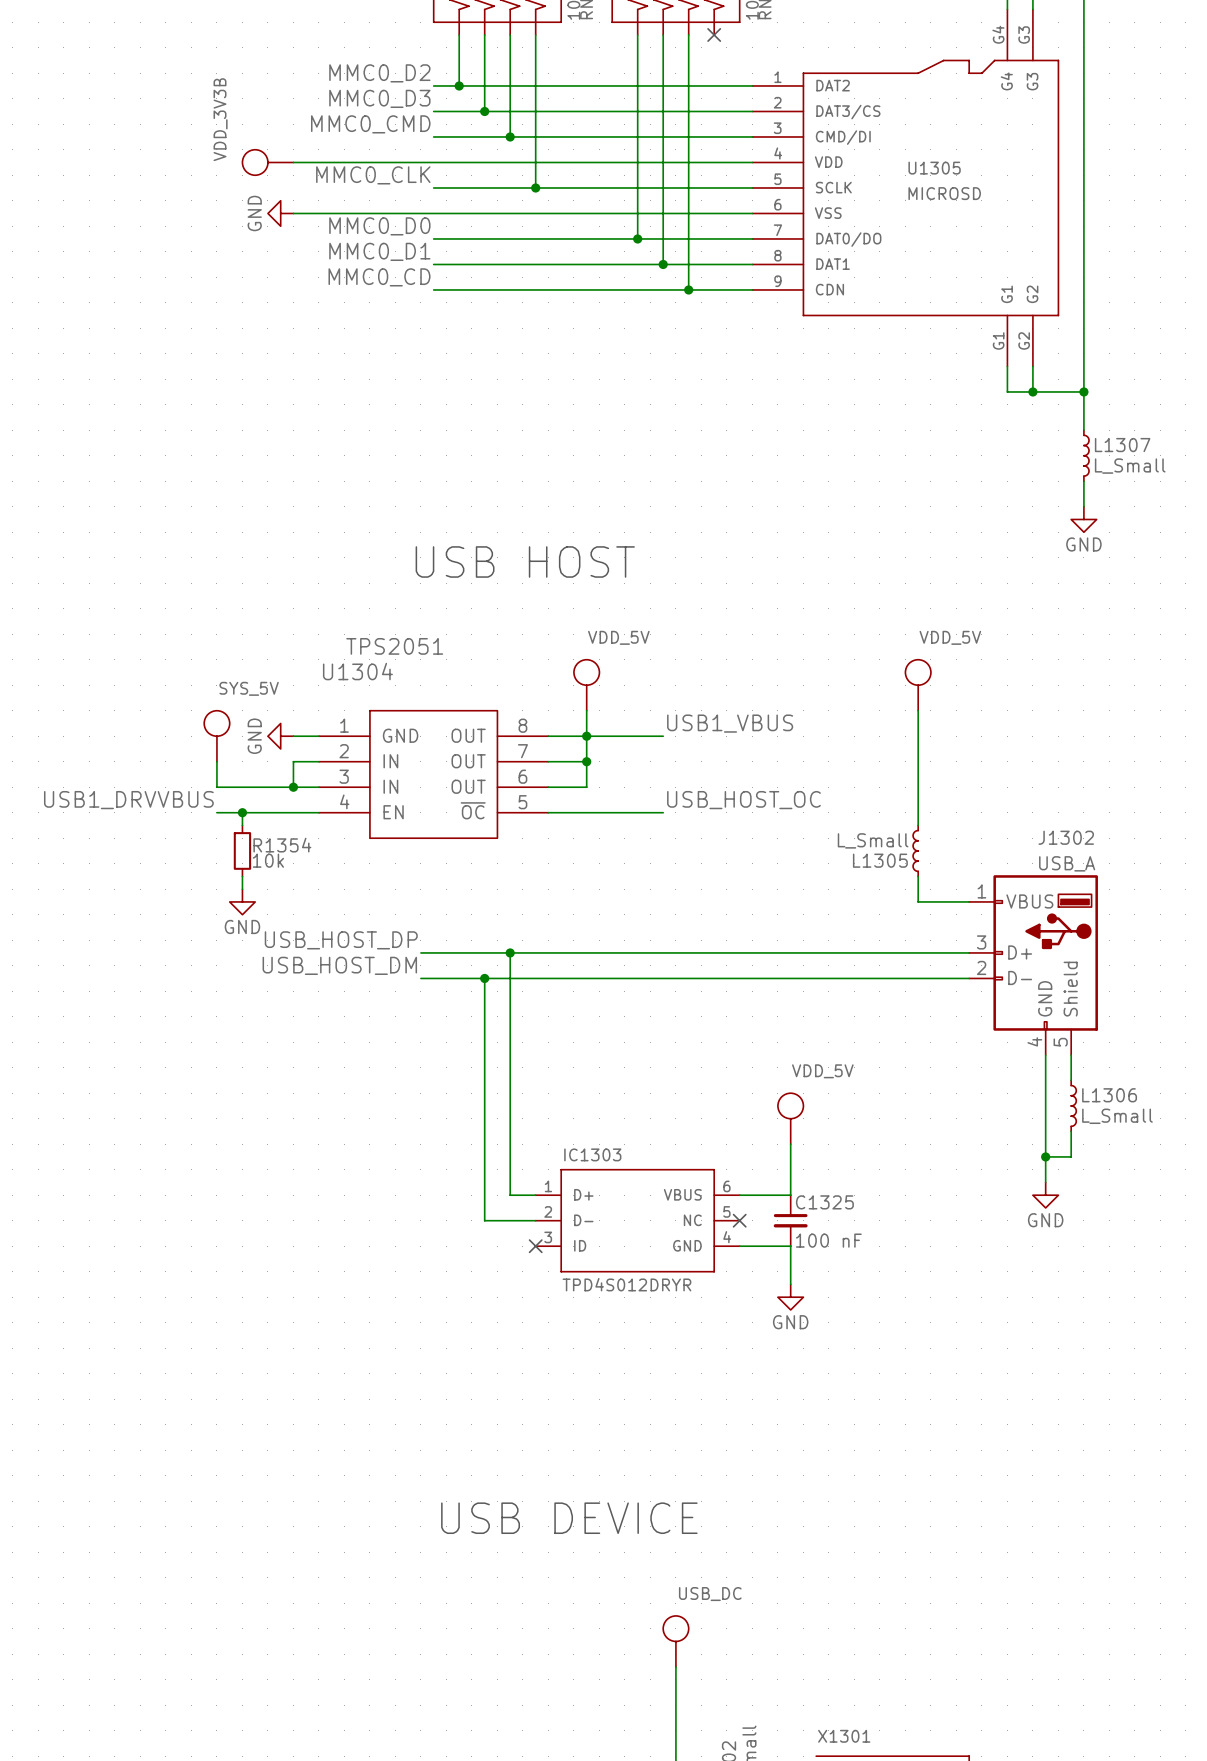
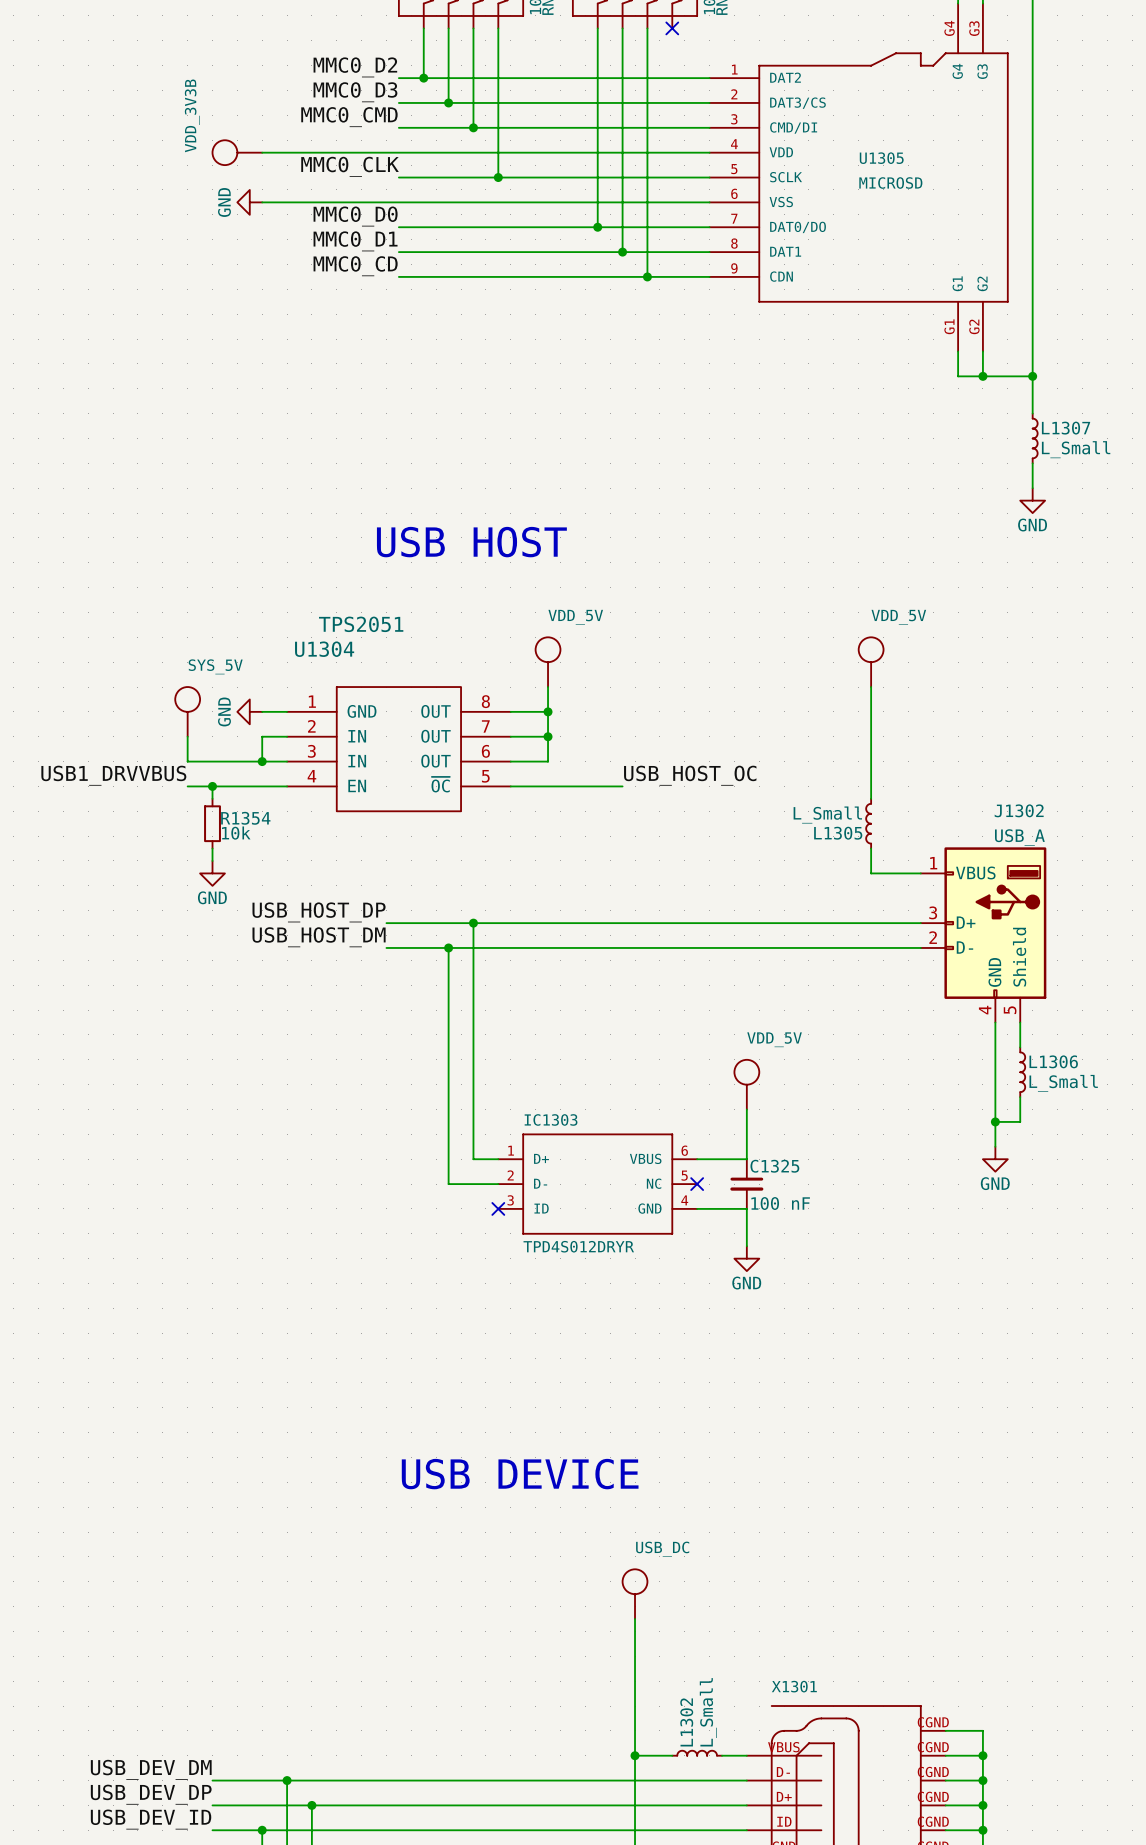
label: USB1_VBUS (730, 723) -> none
wire: (586, 736) (663, 736) -> none

